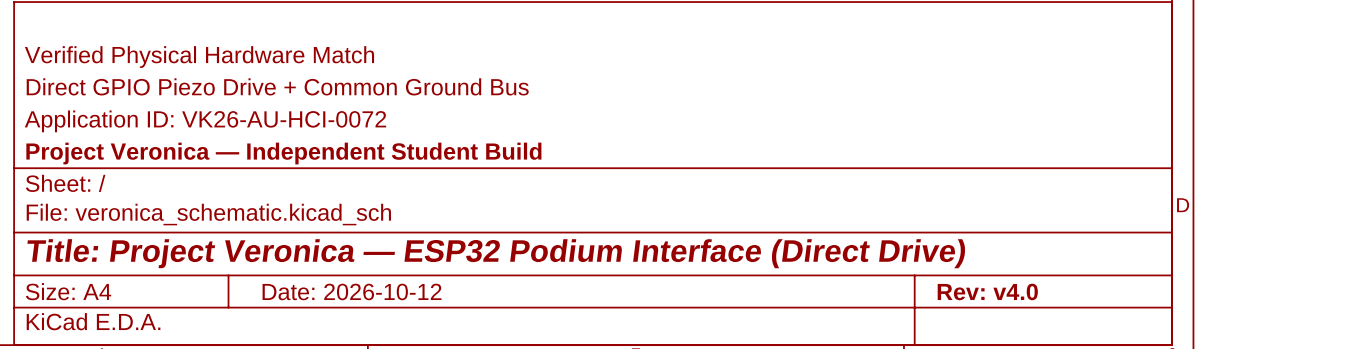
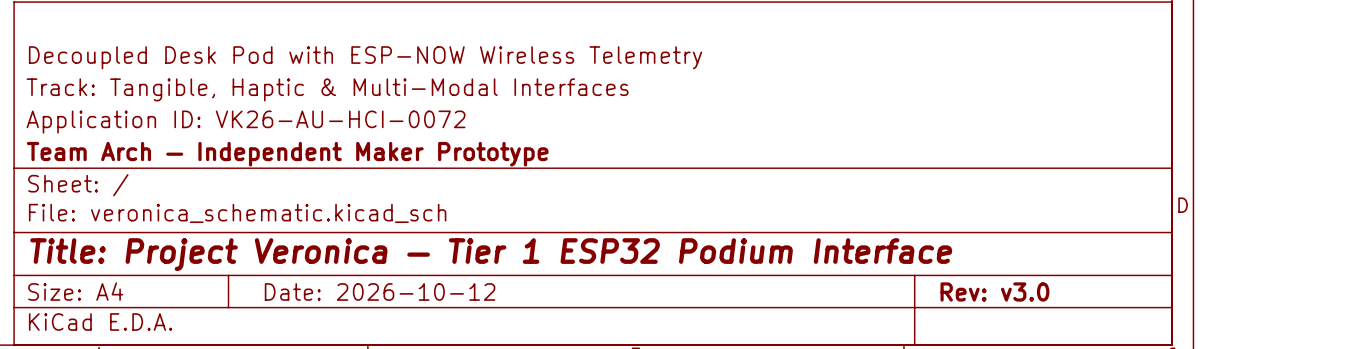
title block: Verified Physical Hardware Match (199, 57) -> Decoupled Desk Pod with ESP-NOW Wireless Telemetry (365, 57)
title block: Direct GPIO Piezo Drive + Common Ground Bus (277, 86) -> Track: Tangible, Haptic & Multi-Modal Interfaces (327, 89)
title block: Project Veronica — Independent Student Build (283, 153) -> Team Arch — Independent Maker Prototype (287, 154)
title block: Title: Project Veronica — ESP32 Podium Interface (Direct Drive) (496, 253) -> Title: Project Veronica — Tier 1 ESP32 Podium Interface (491, 254)
title block: Rev: v4.0 (987, 291) -> Rev: v3.0 (994, 291)

